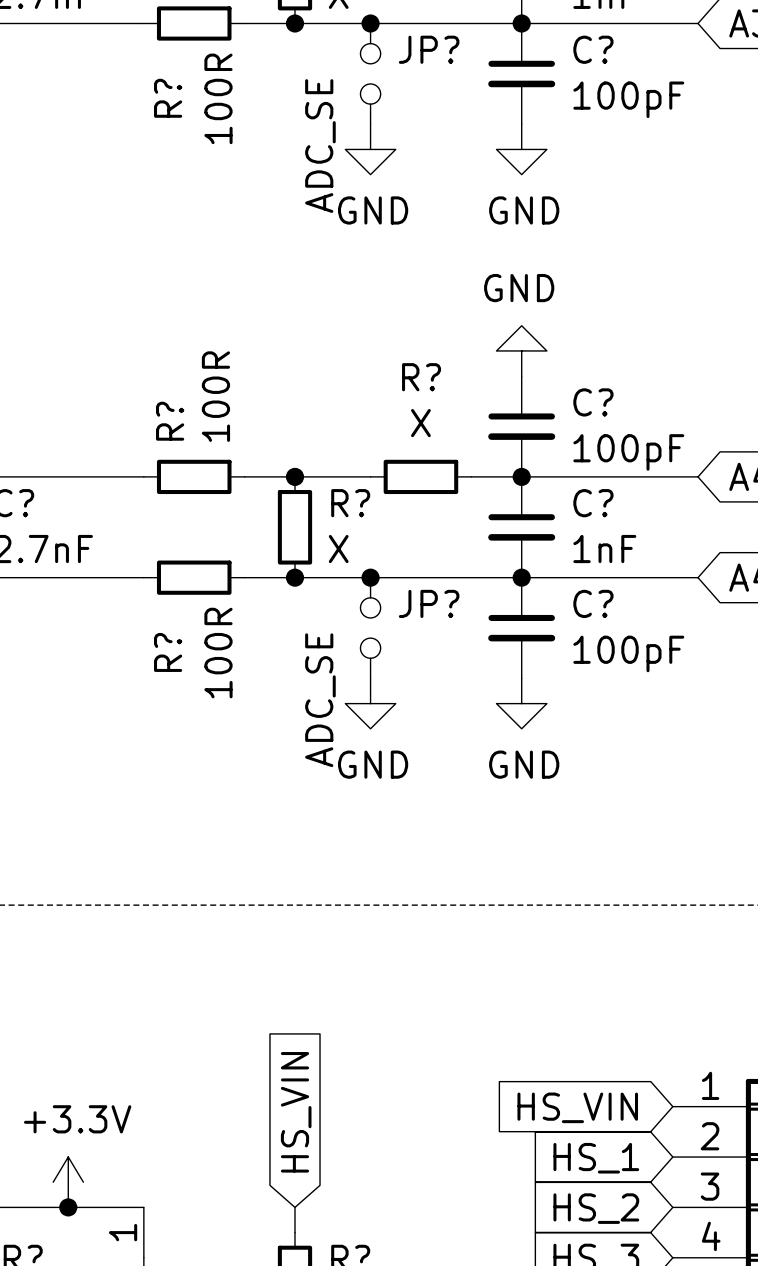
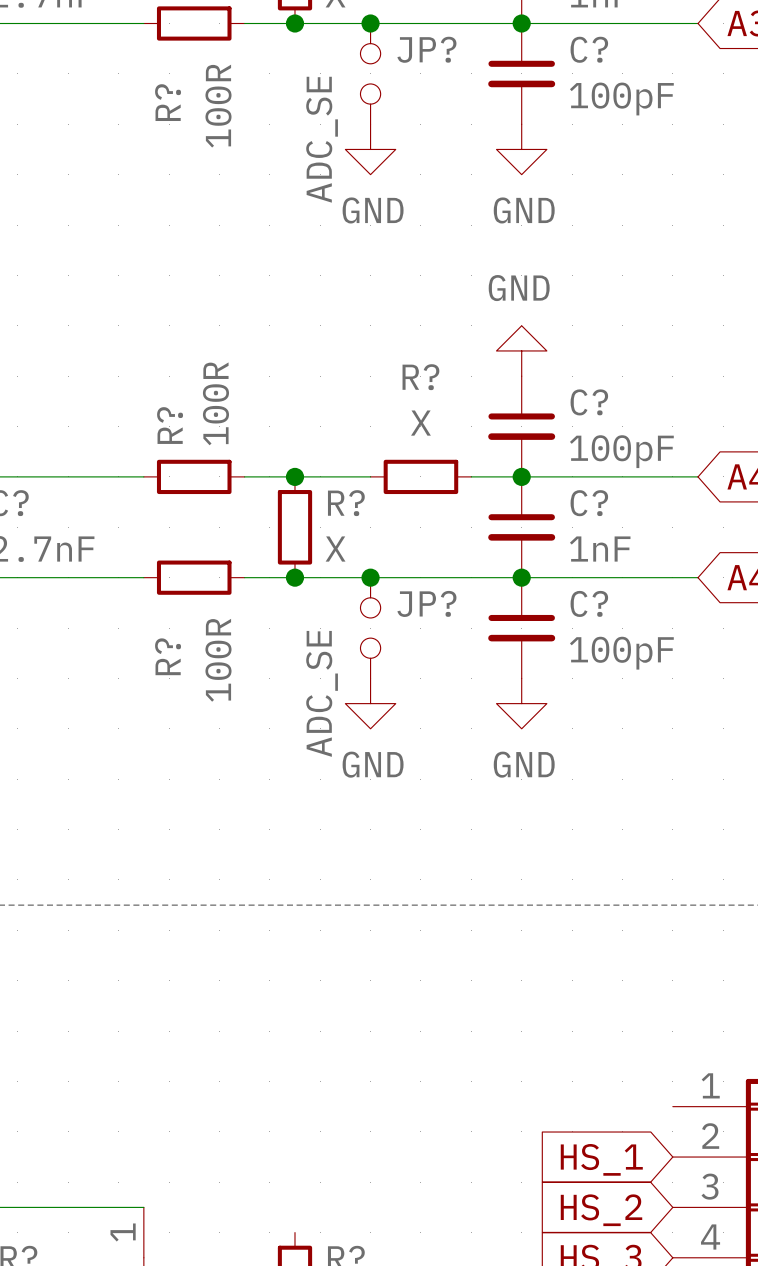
global label: HS_VIN (577, 1107) -> none
global label: HS_VIN (296, 1112) -> none
power symbol: +3.3V (68, 1182) -> none
junction: (68, 1207) -> none
wire: (294, 1207) (294, 1232) -> none

